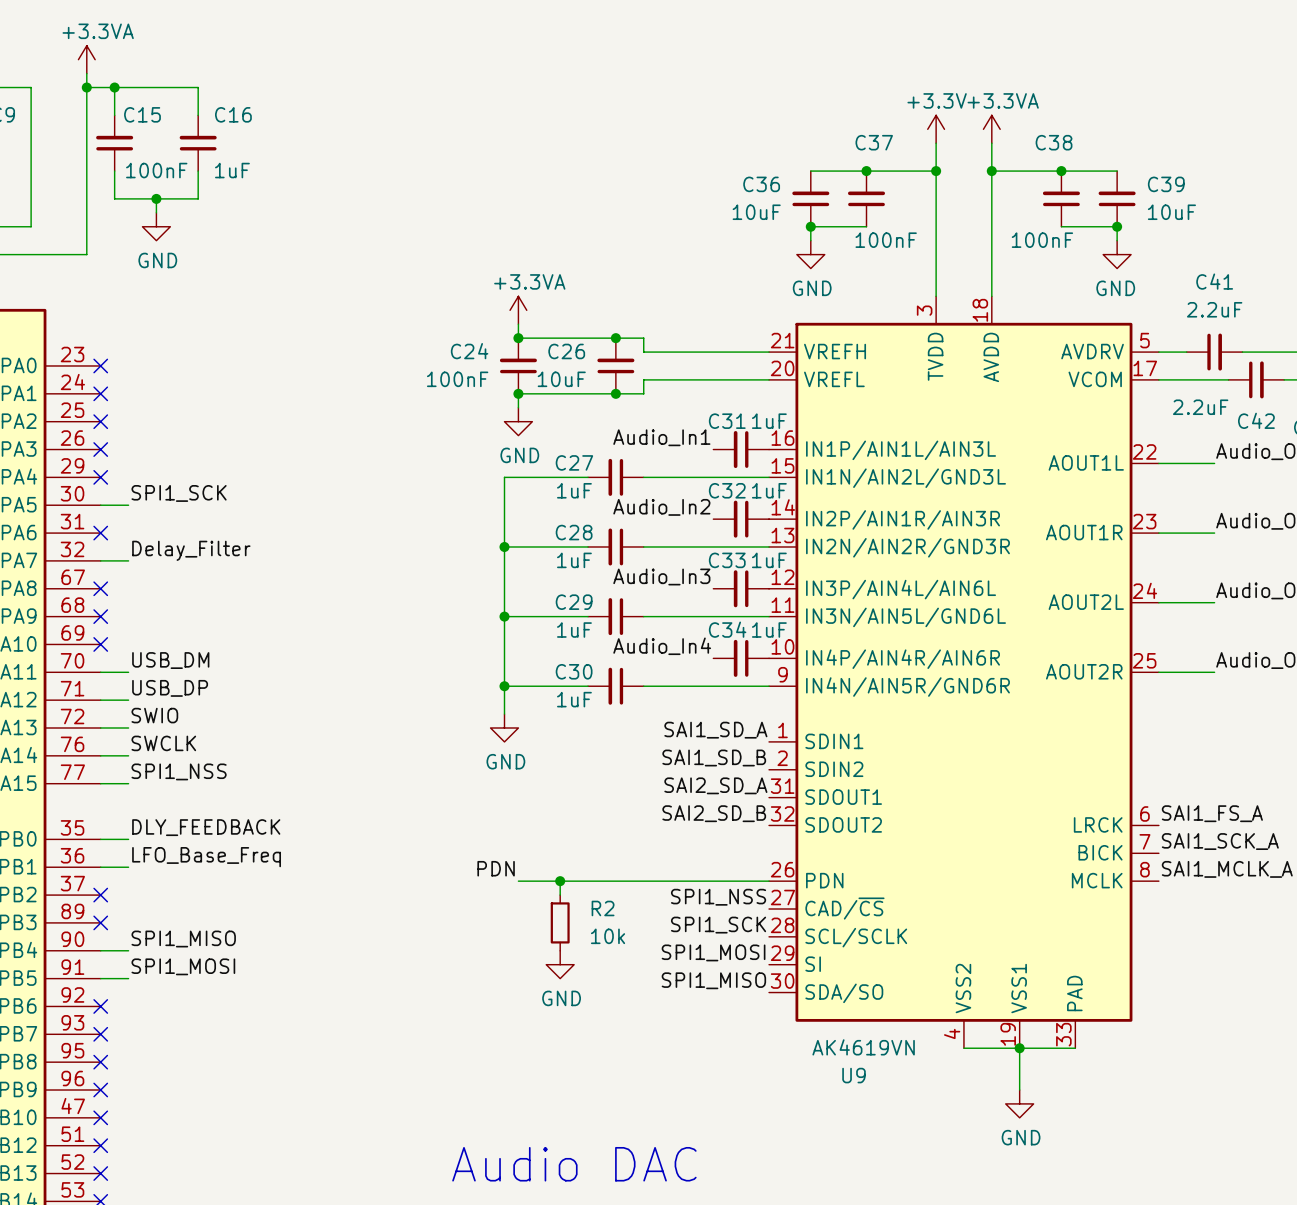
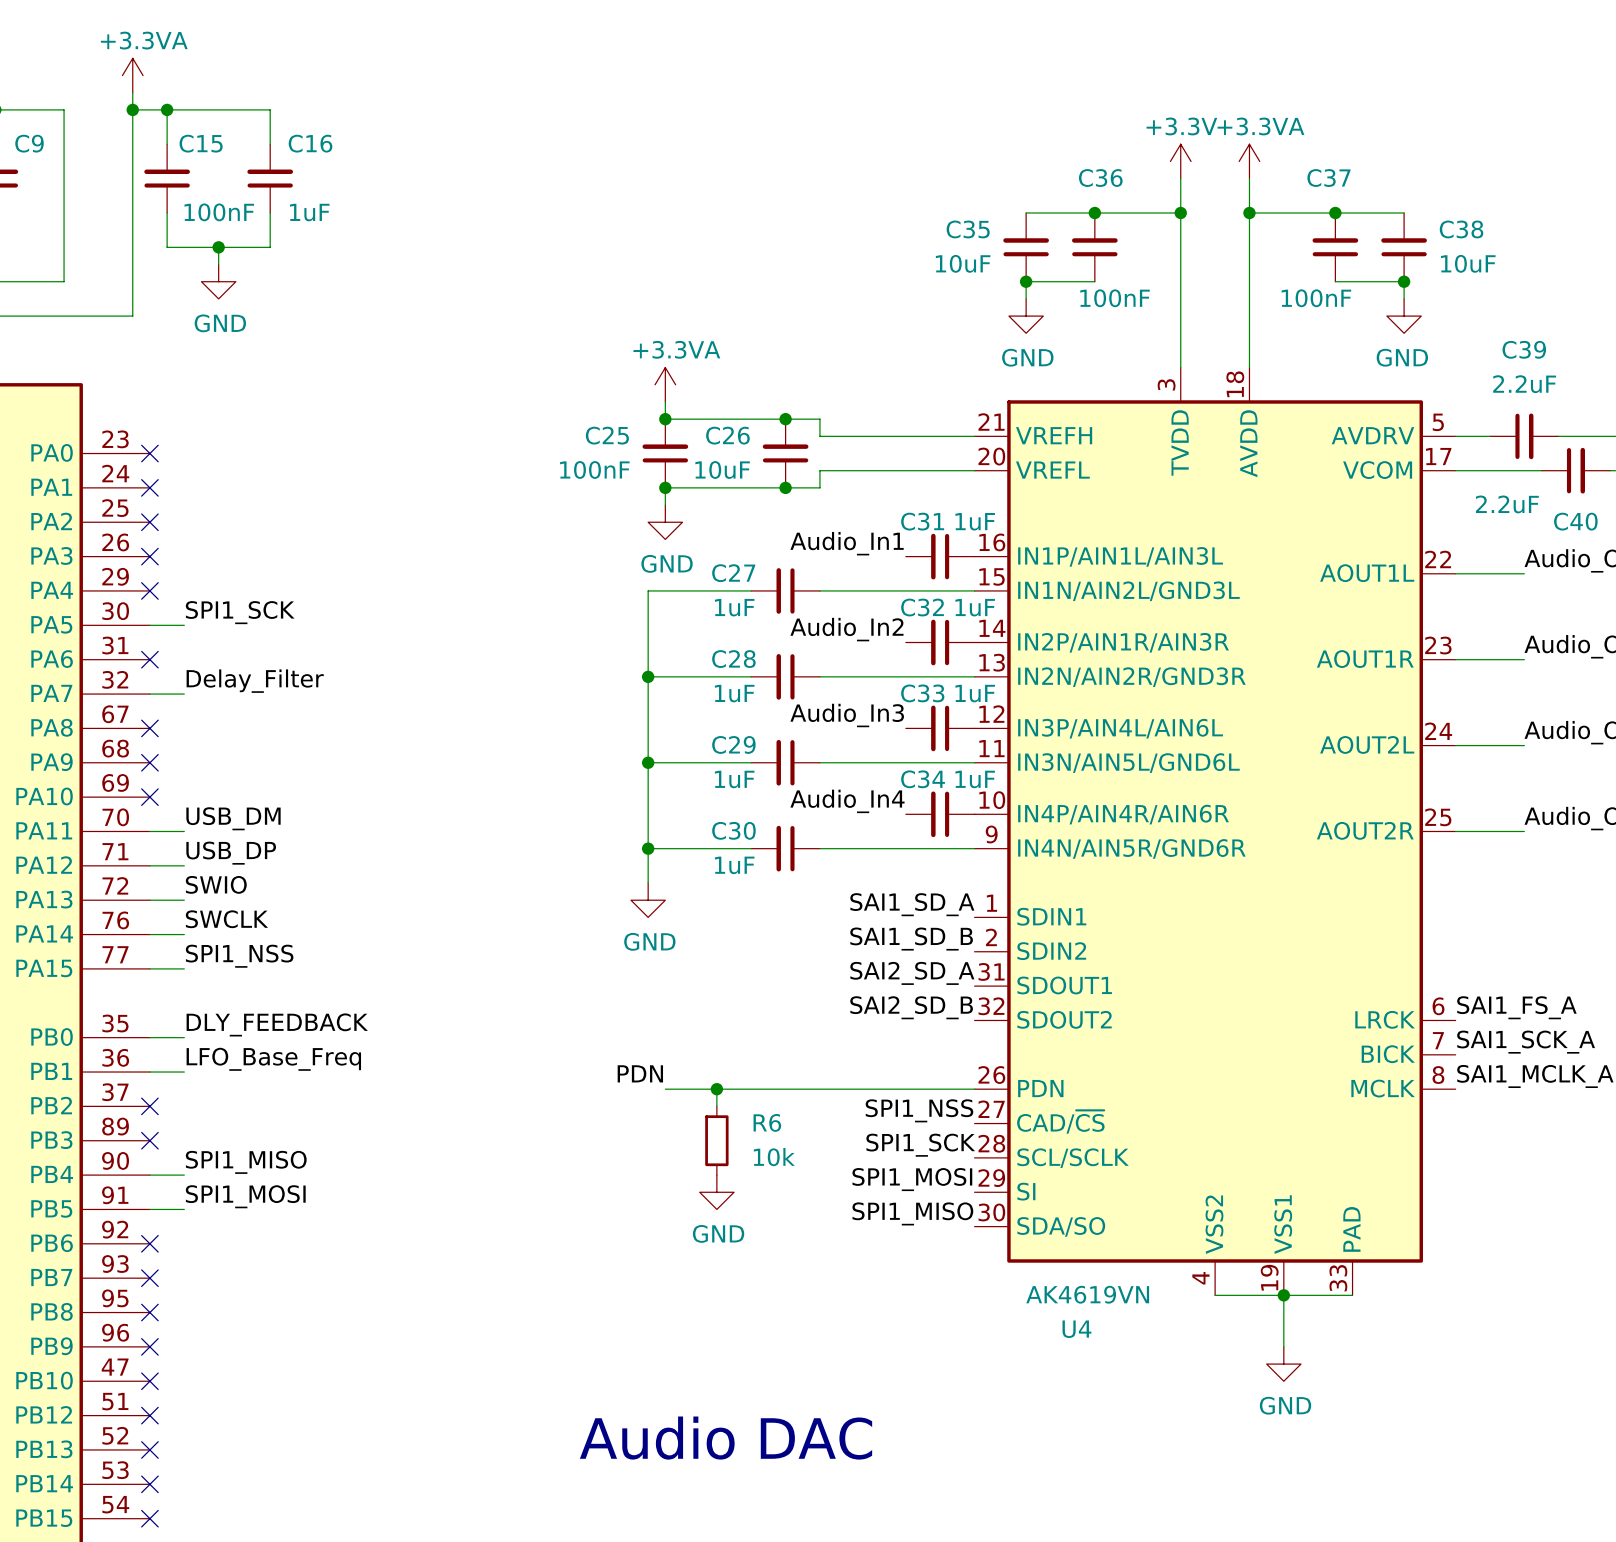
C37 name: C37 (874, 142) -> C36 (1100, 178)
C38 name: C38 (1054, 142) -> C37 (1328, 178)
C36 name: C36 (761, 184) -> C35 (968, 229)
C39 name: C39 (1166, 184) -> C38 (1461, 229)
C41 name: C41 (1214, 281) -> C39 (1524, 349)
C24 name: C24 (469, 351) -> C25 (607, 435)
C42 name: C42 (1256, 420) -> C40 (1575, 521)
R2 name: R2 (603, 908) -> R6 (767, 1122)
U9 name: U9 (854, 1075) -> U4 (1076, 1329)

